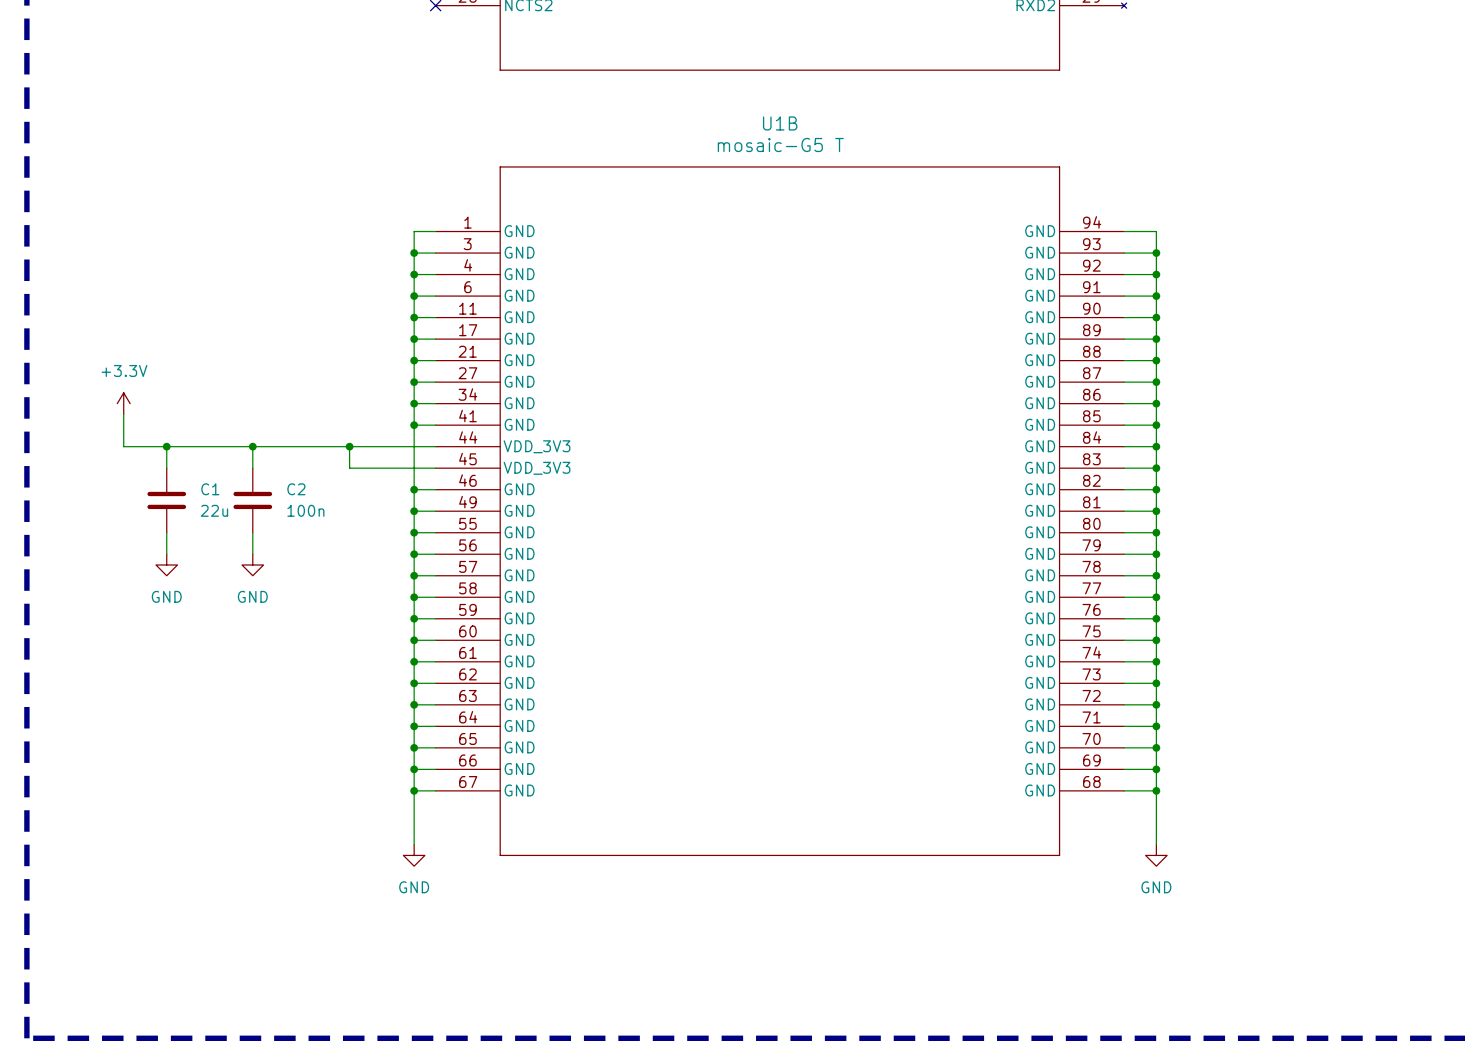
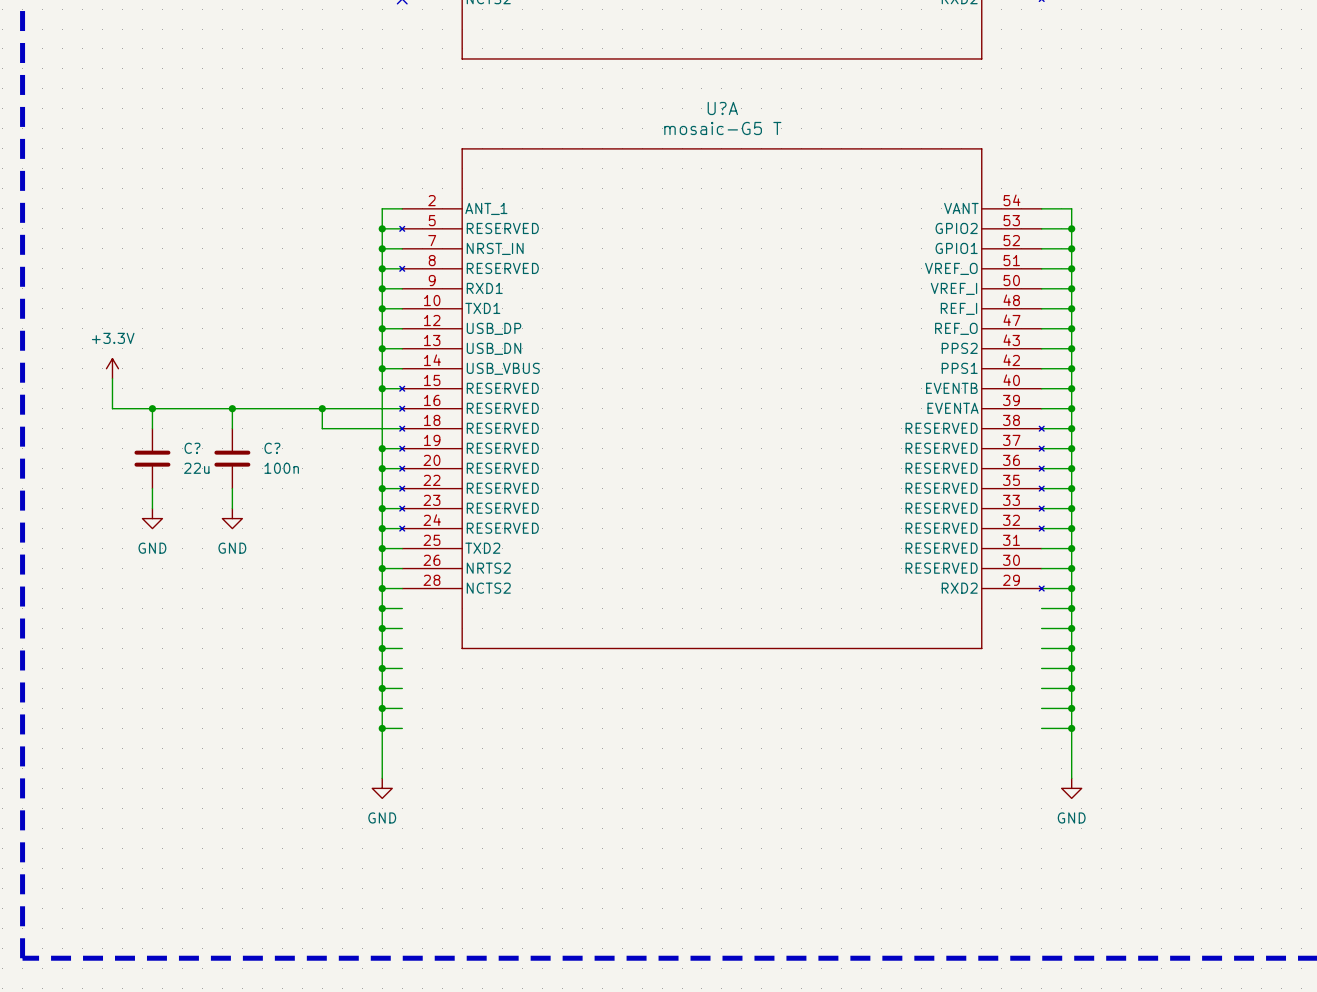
U?A: none -> mosaic-G5 T (721, 398)
C1 name: C1 (210, 489) -> C? (192, 448)
C2 name: C2 (296, 489) -> C? (272, 448)
U1B: mosaic-G5 T (779, 511) -> none

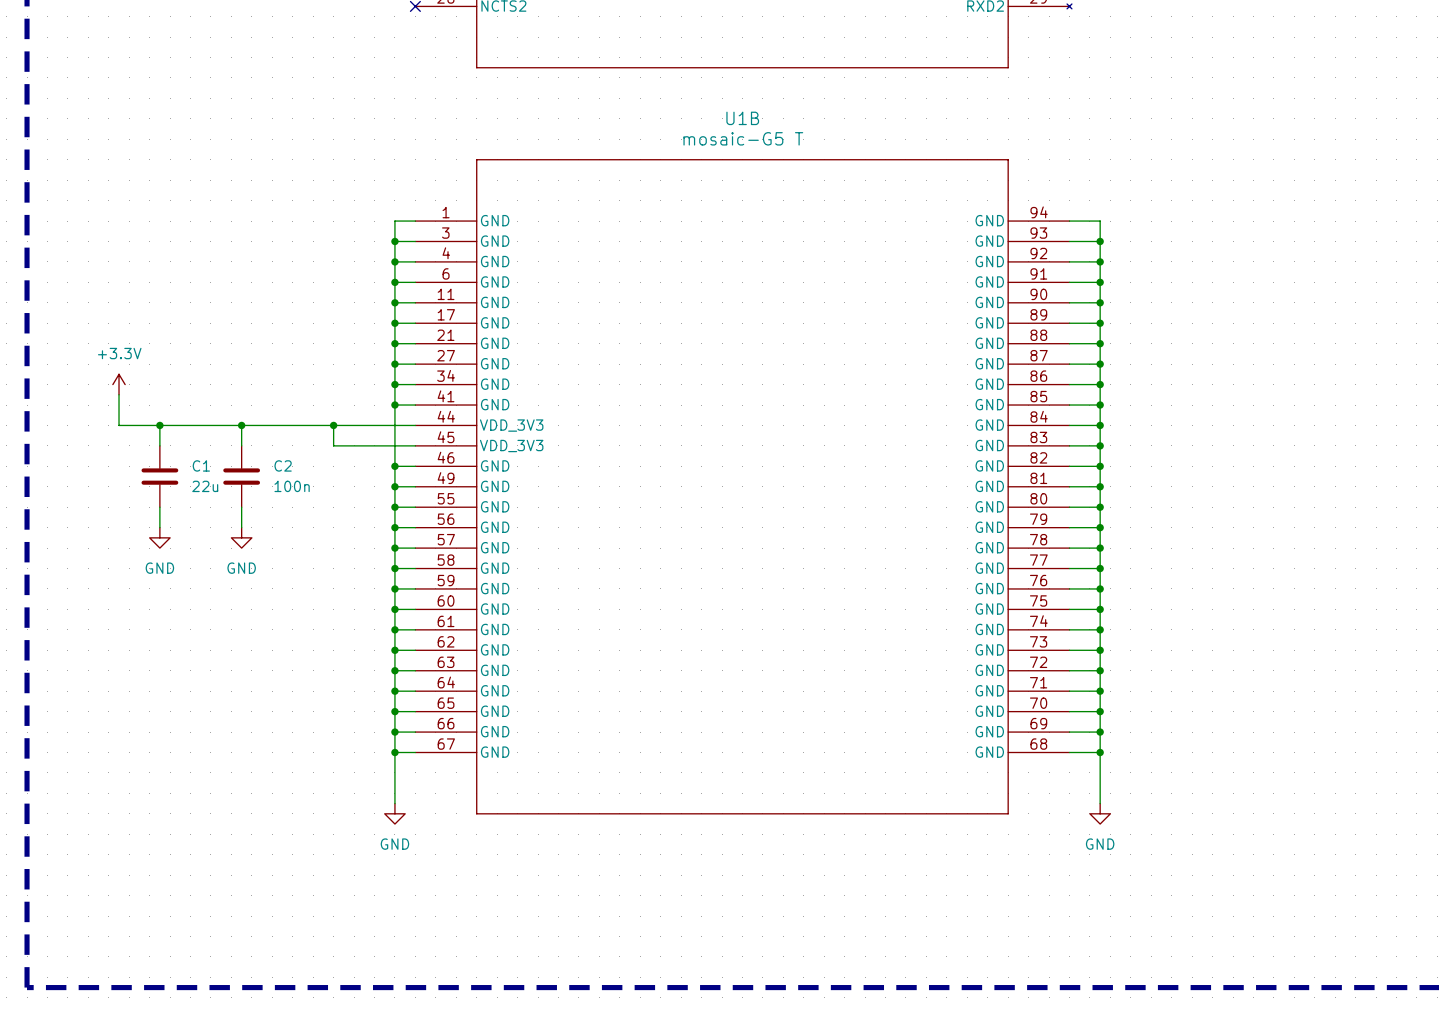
U?A: mosaic-G5 T (721, 398) -> none
C? name: C? (192, 448) -> C1 (201, 465)
C? name: C? (272, 448) -> C2 (283, 465)
U1B: none -> mosaic-G5 T (742, 486)

